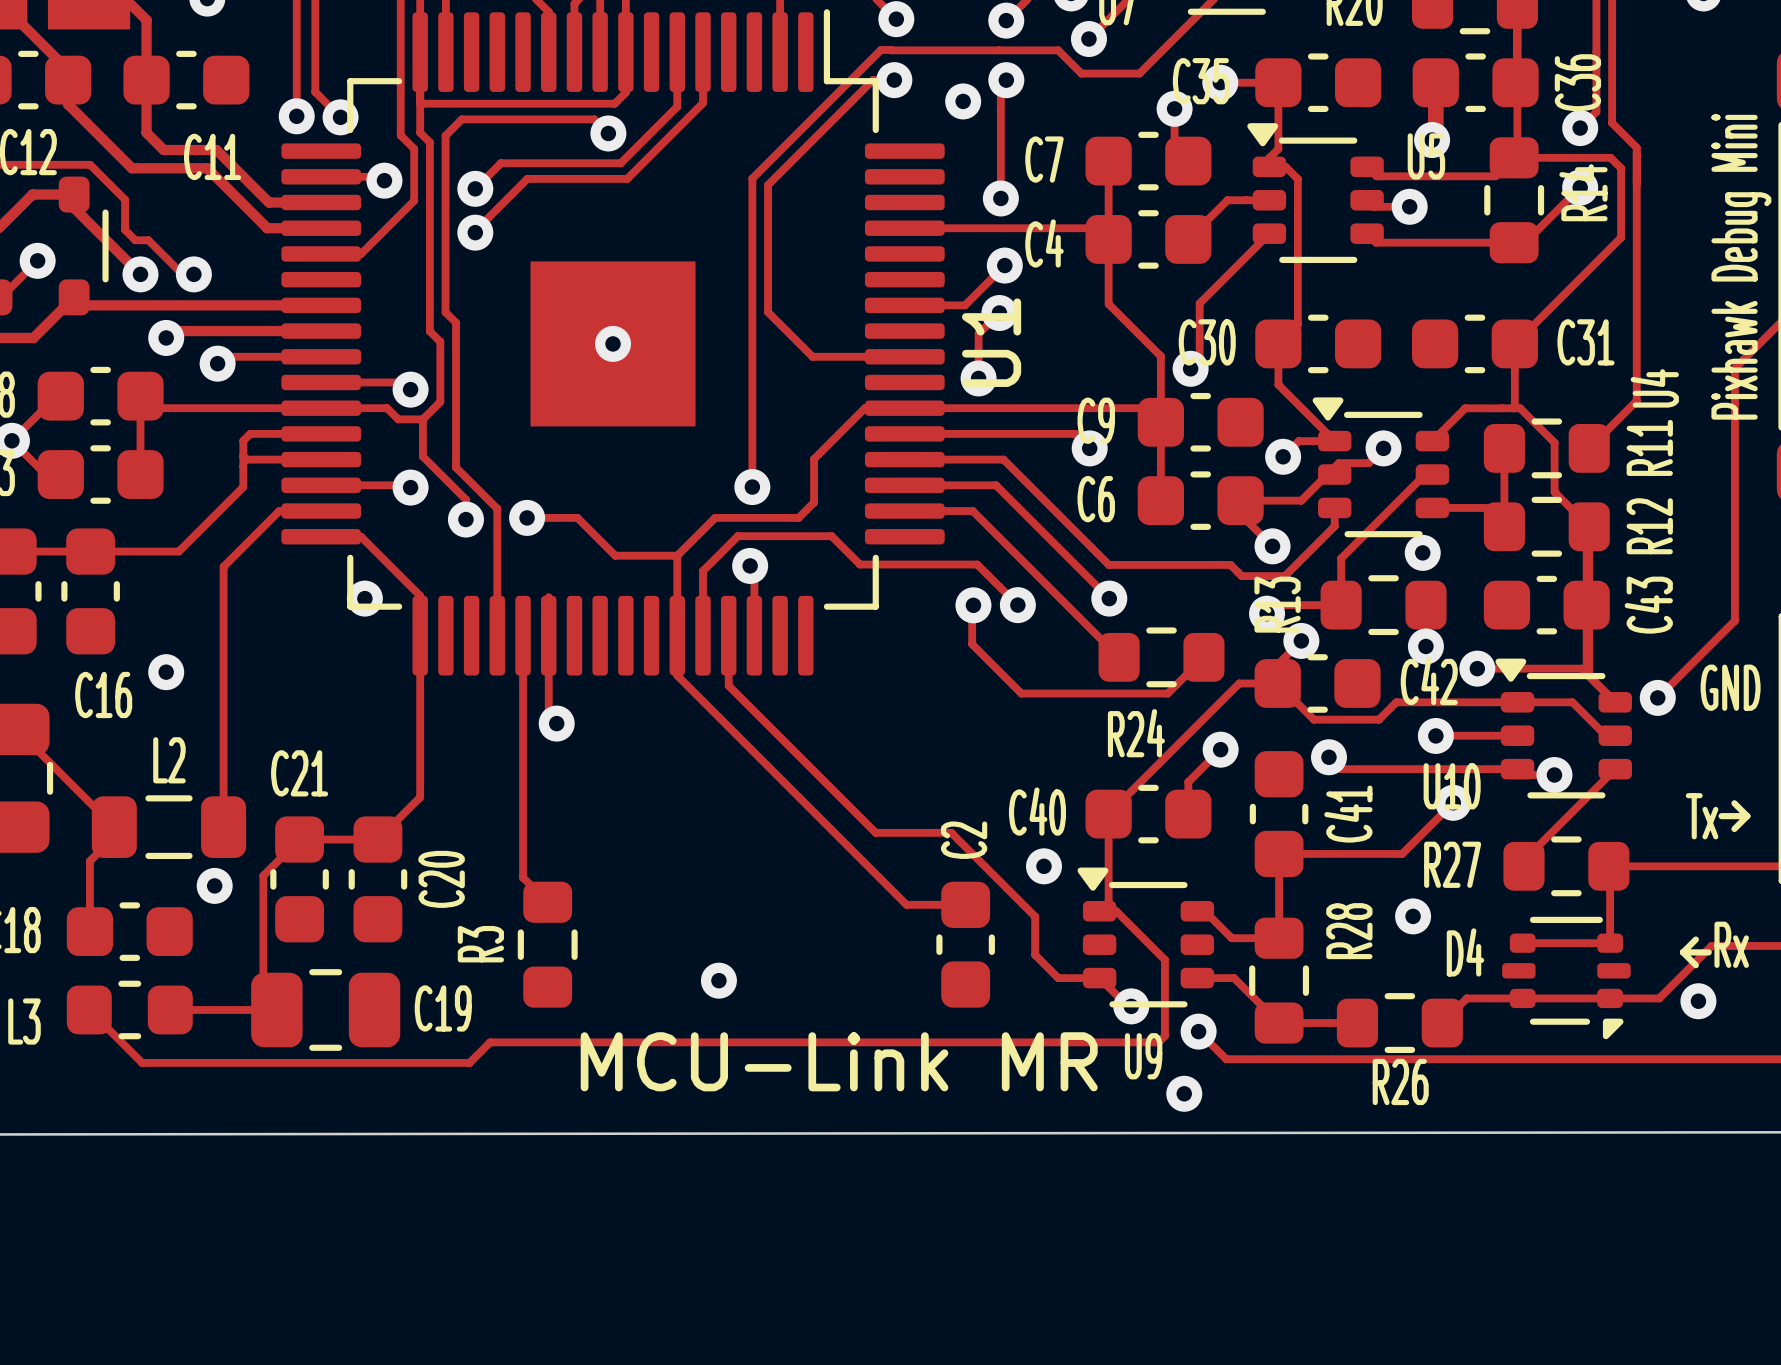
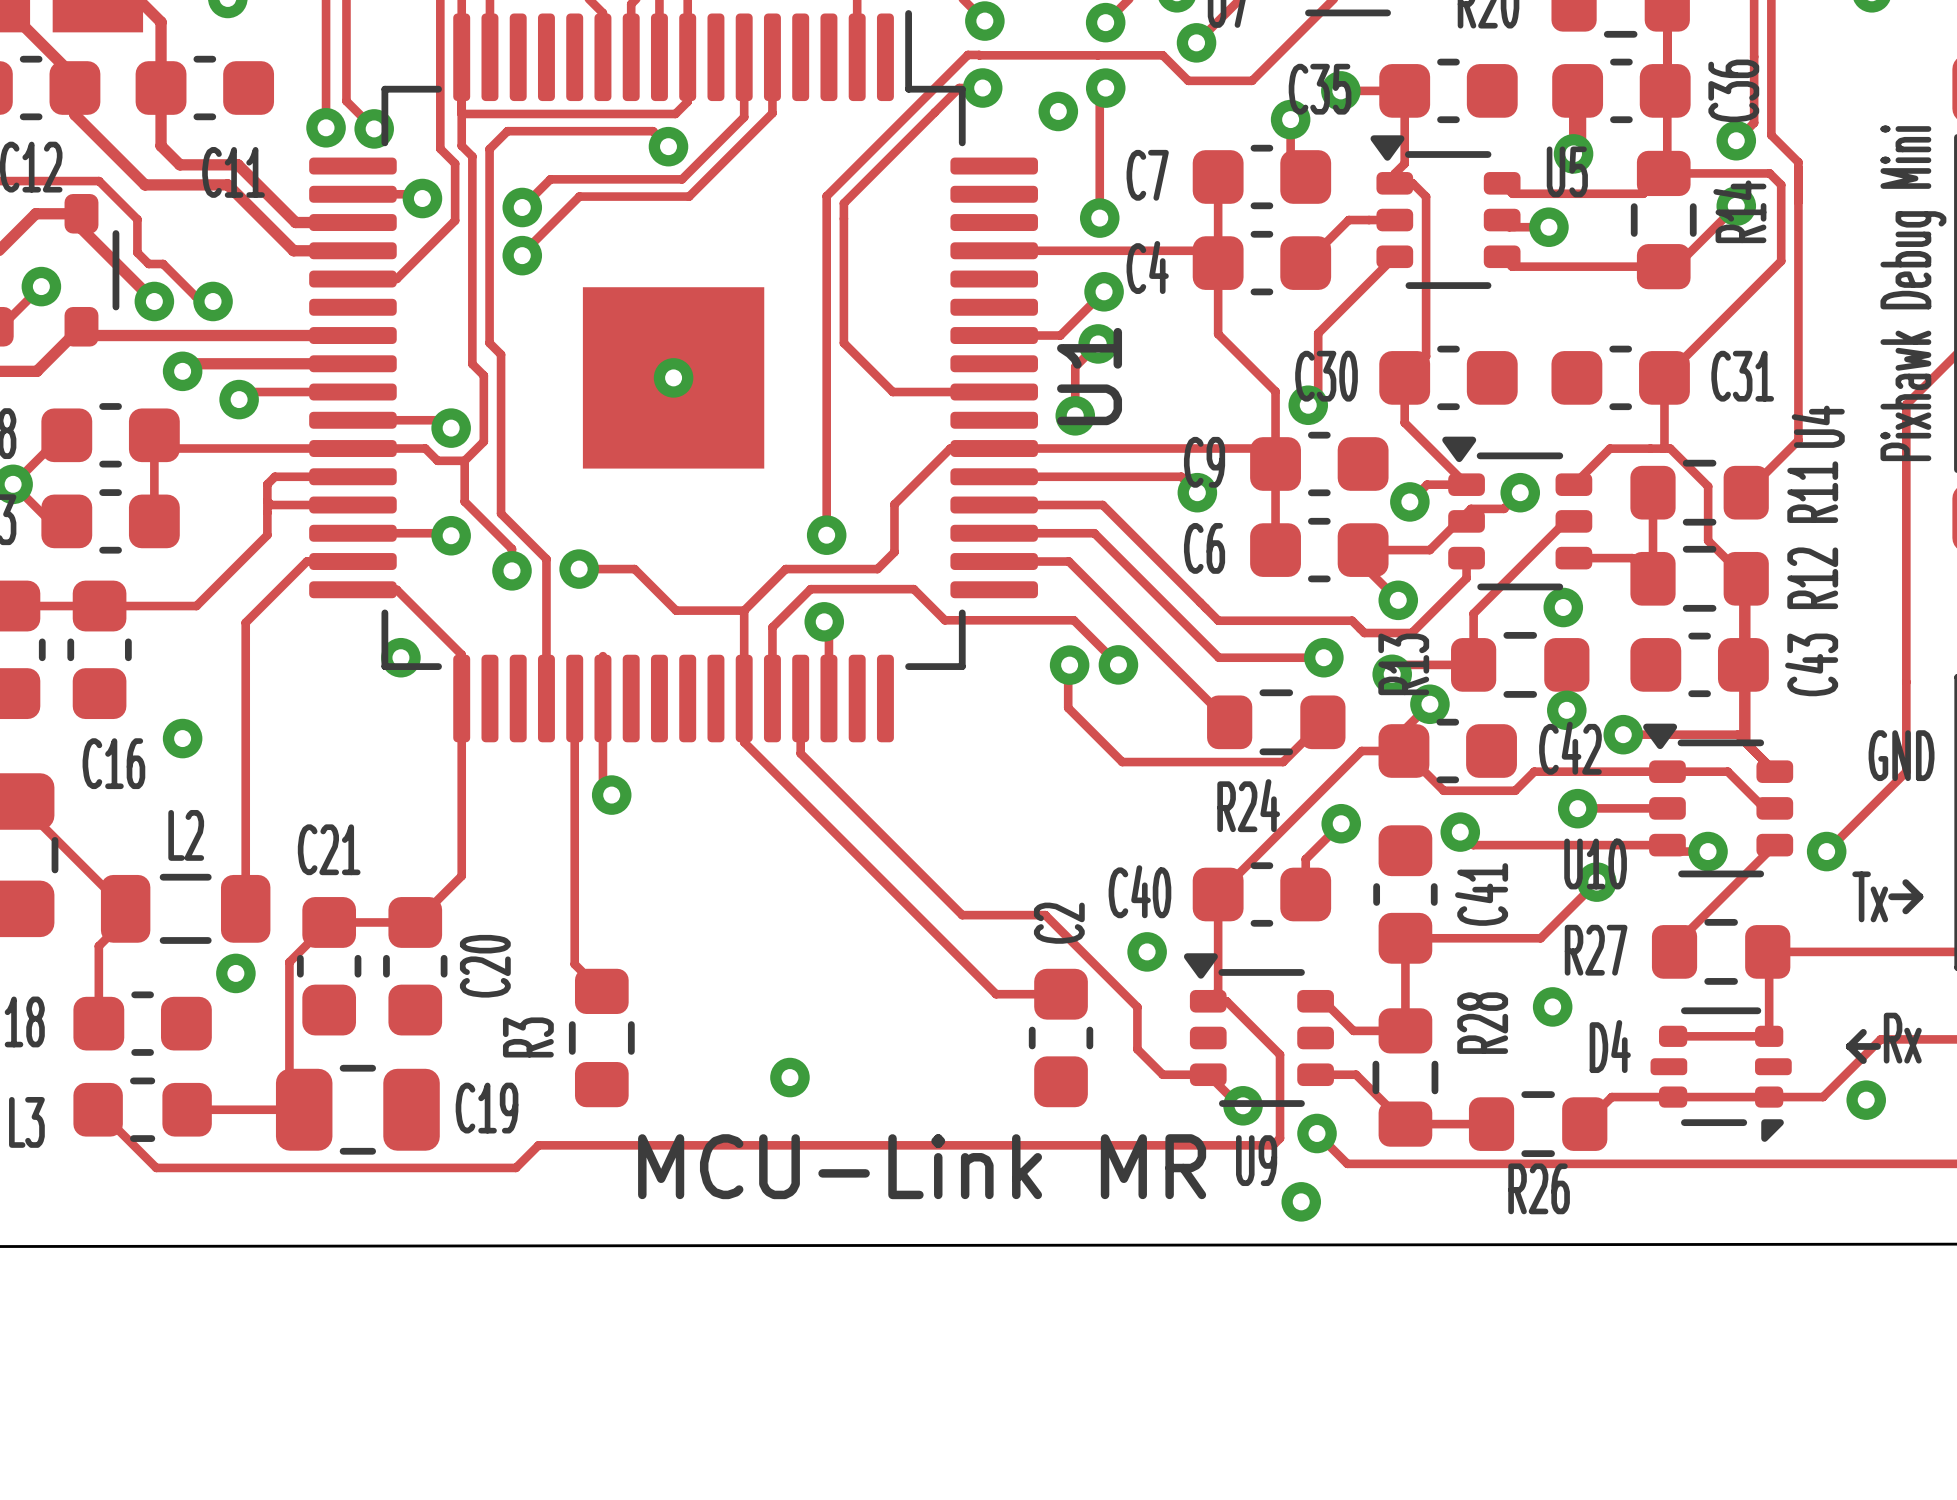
track: none -> (1218, 657) (1323, 657)
via position: (1109, 598) -> (1323, 657)
track: (1734, 620) (1657, 697) -> (1906, 682) (1906, 771) (1826, 851)
via position: (1657, 697) -> (1826, 851)

